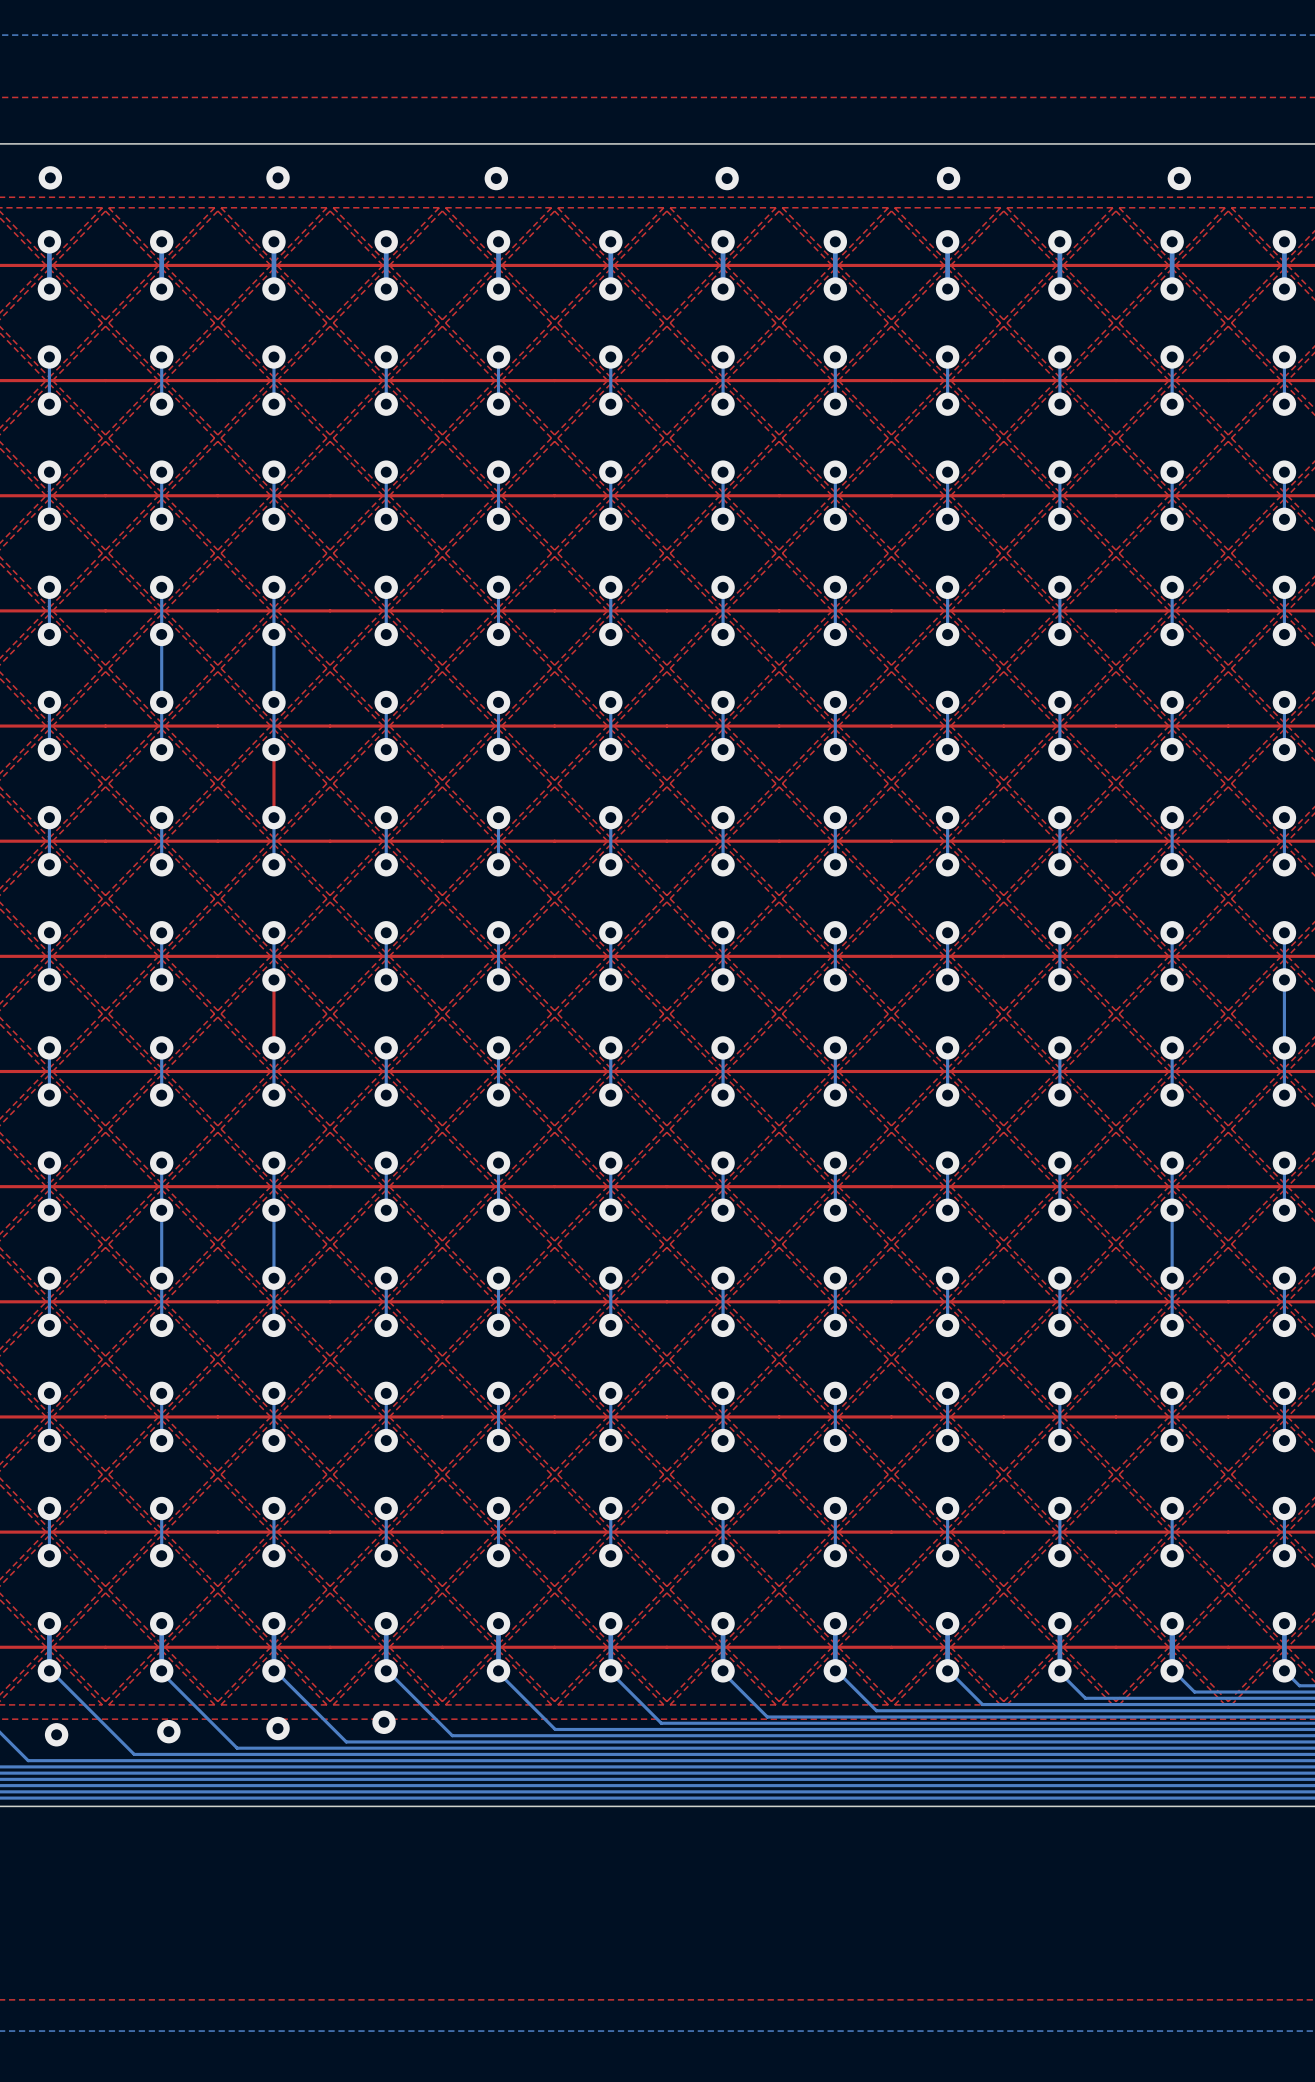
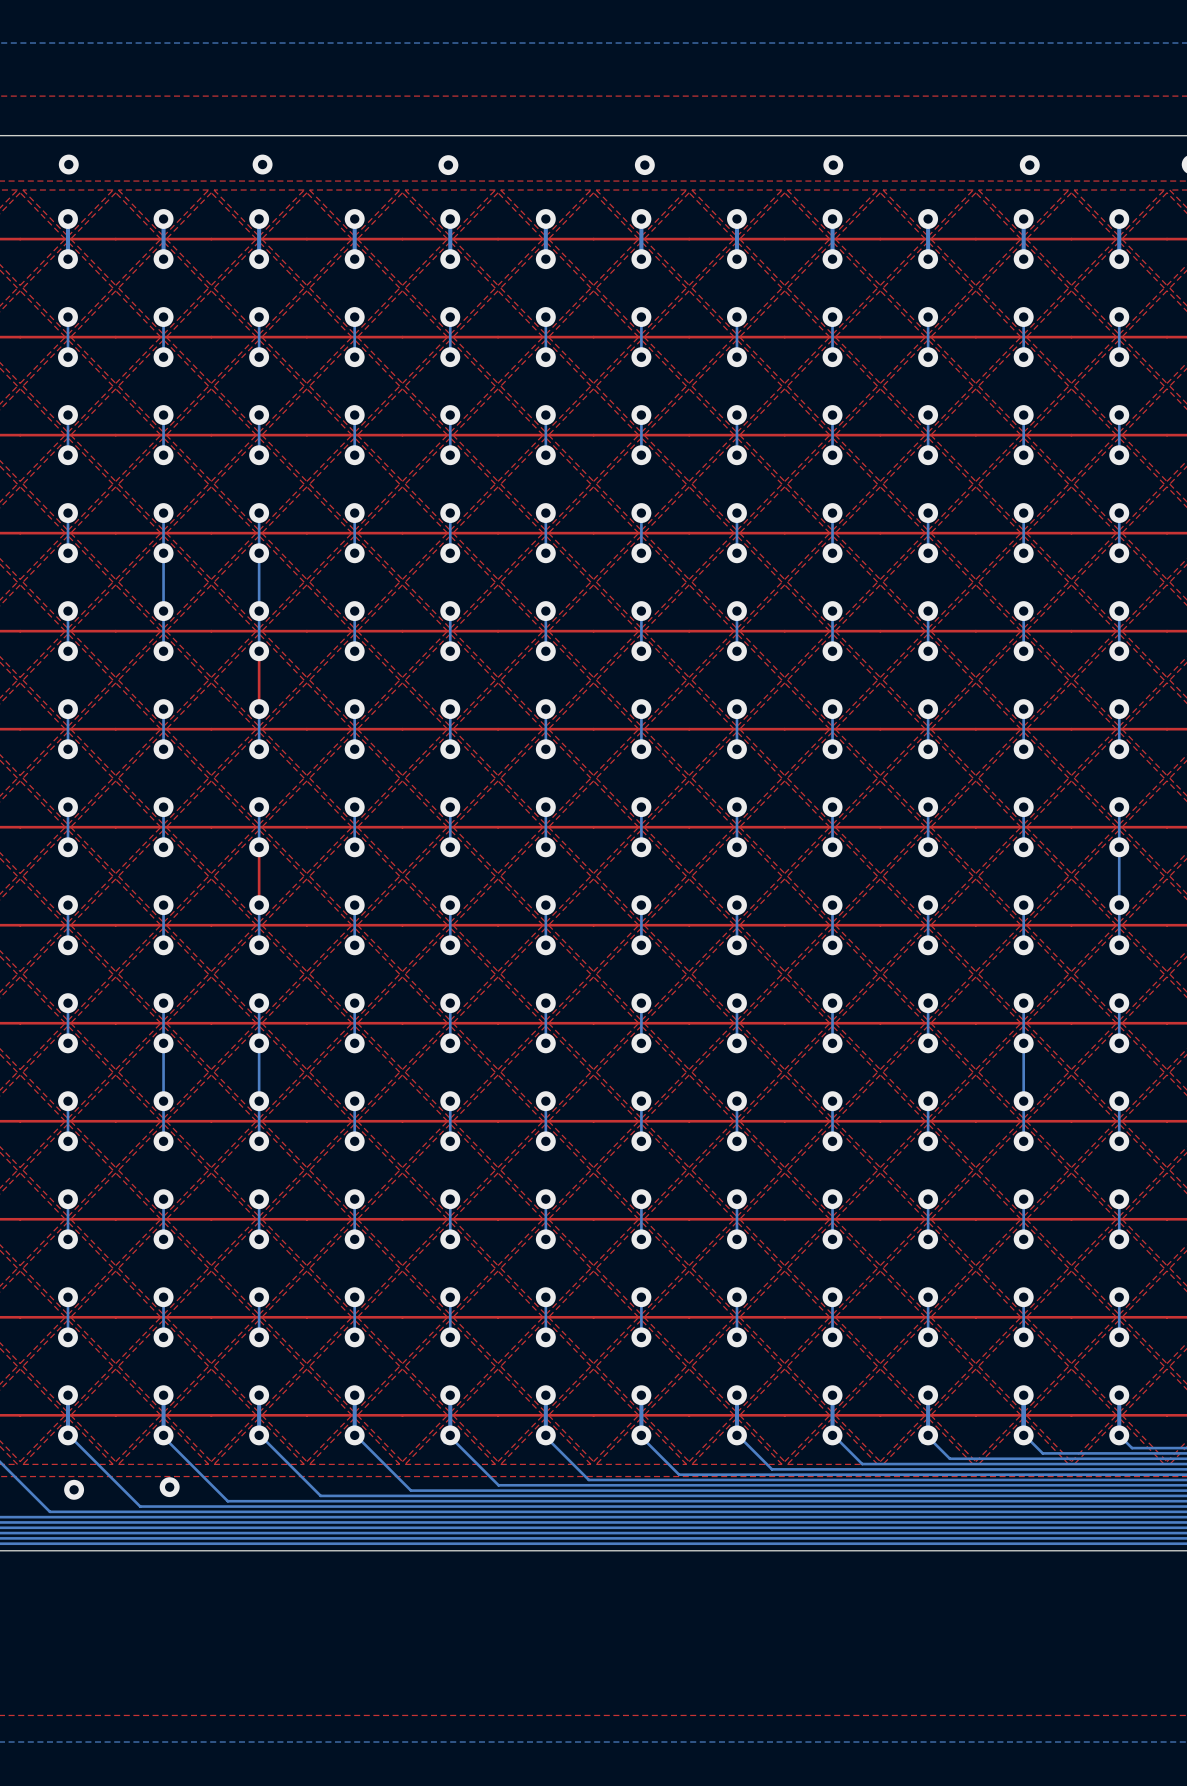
via: (384, 1722) -> none
via: (278, 1728) -> none

